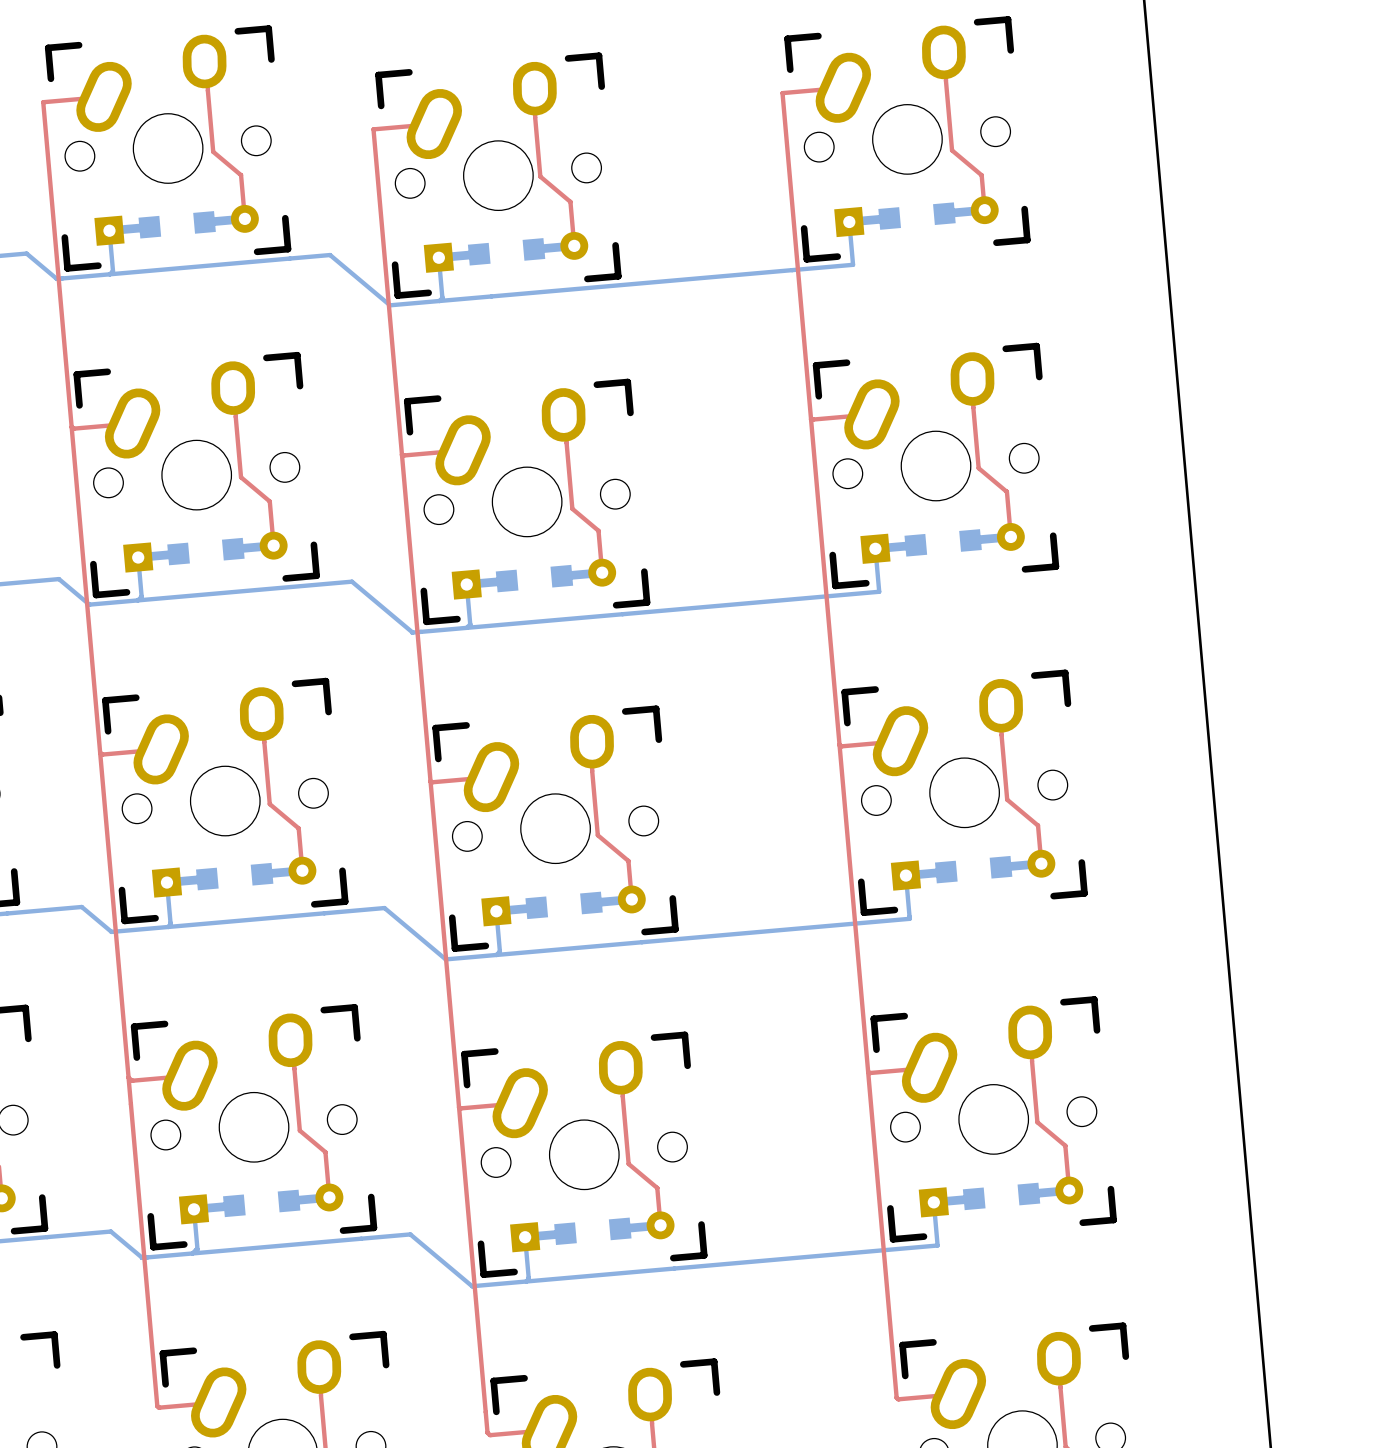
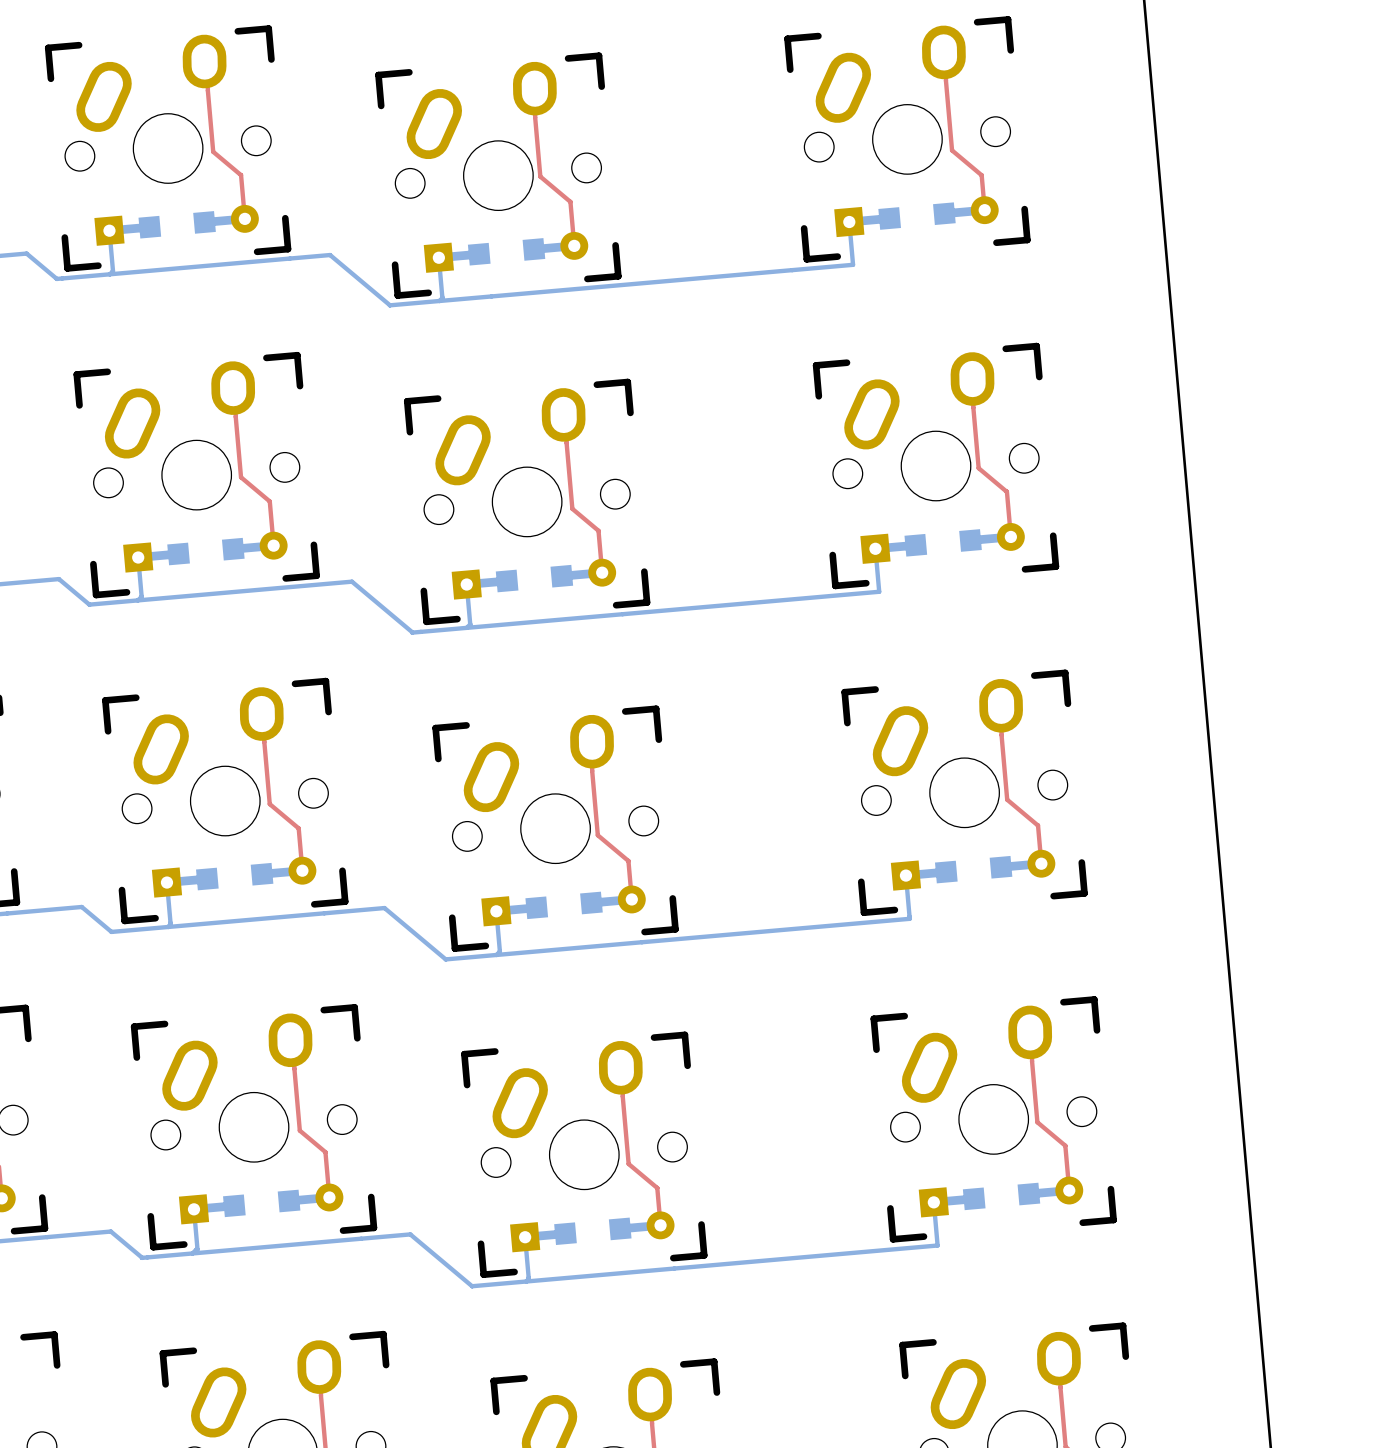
top track: (843, 87) (782, 93) (896, 1397) (899, 1399) (958, 1394) -> none
top track: (104, 96) (43, 102) (157, 1406) (159, 1407) (218, 1402) -> none
top track: (434, 124) (373, 129) (487, 1432) (490, 1435) (549, 1429) -> none
top track: (871, 414) (811, 419) -> none
top track: (132, 423) (74, 428) (71, 427) -> none
top track: (463, 450) (401, 454) -> none
top track: (900, 741) (841, 746) (839, 744) -> none
top track: (161, 749) (102, 754) (100, 752) -> none
top track: (491, 777) (430, 781) -> none
top track: (929, 1067) (868, 1071) -> none
top track: (189, 1075) (132, 1080) (128, 1077) -> none
top track: (520, 1103) (459, 1107) -> none

